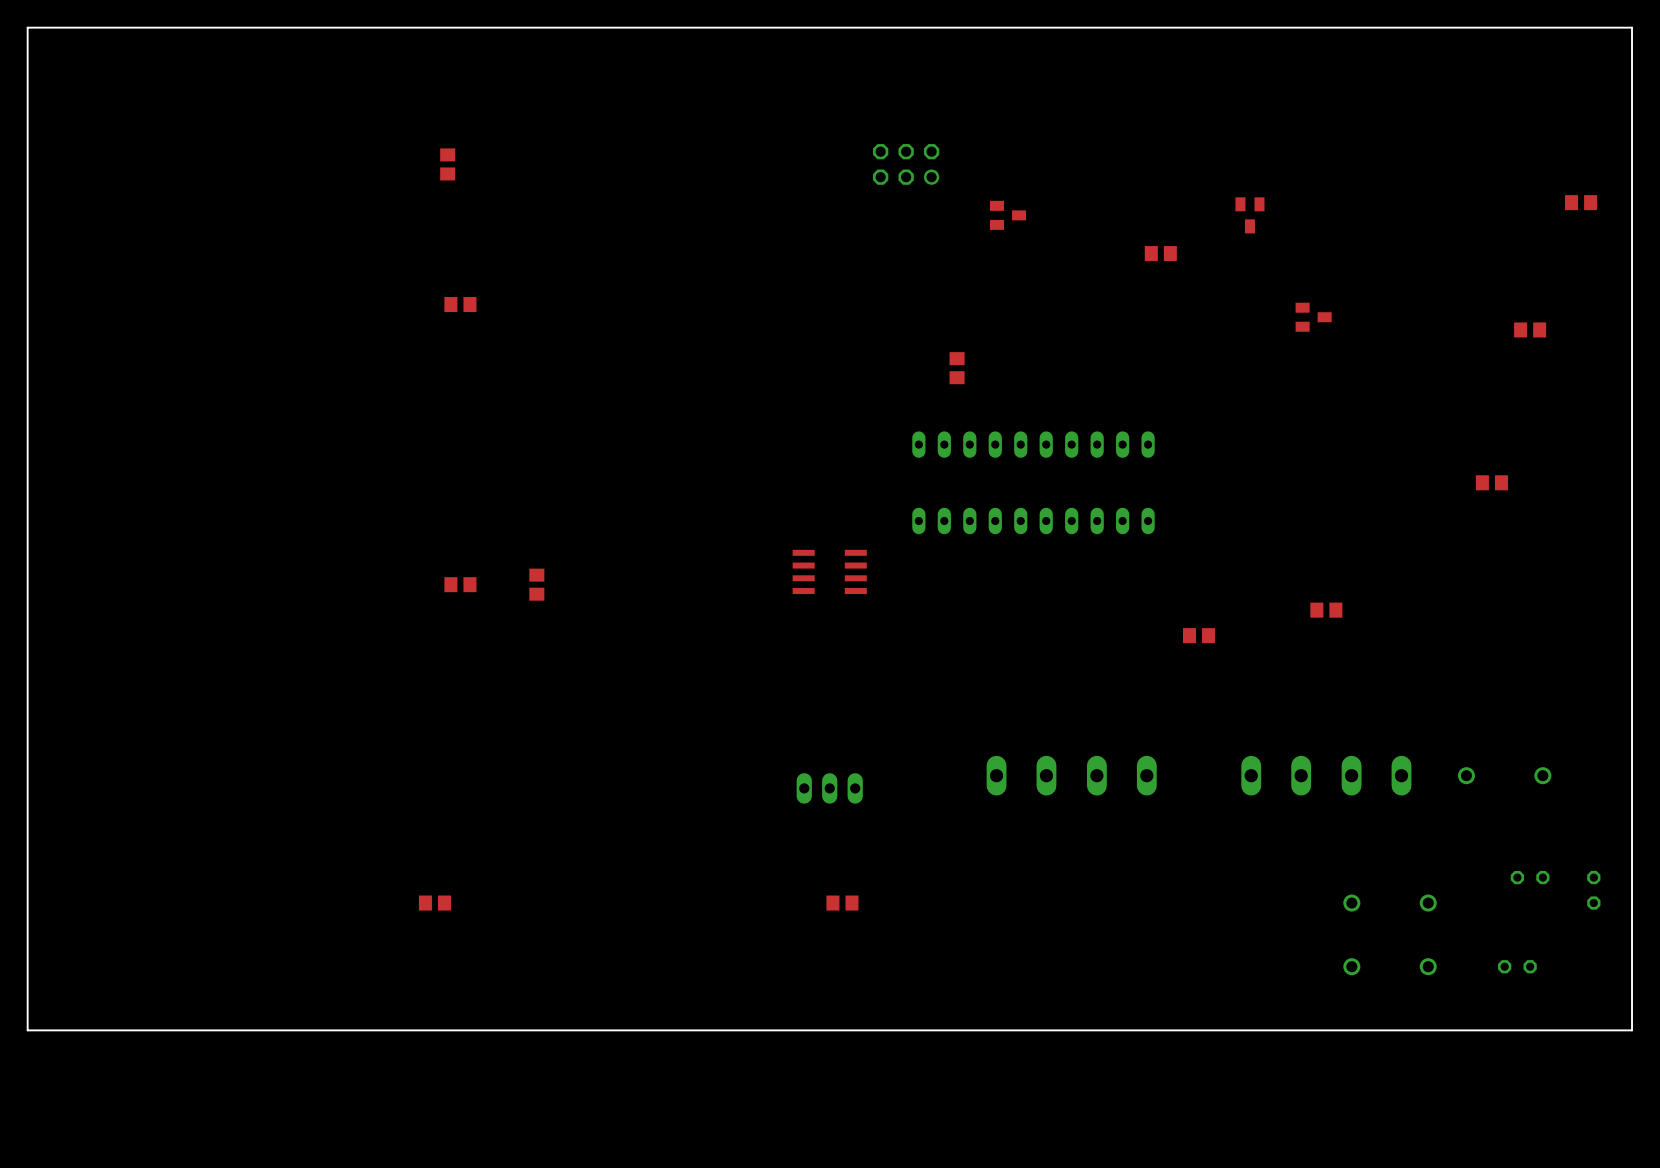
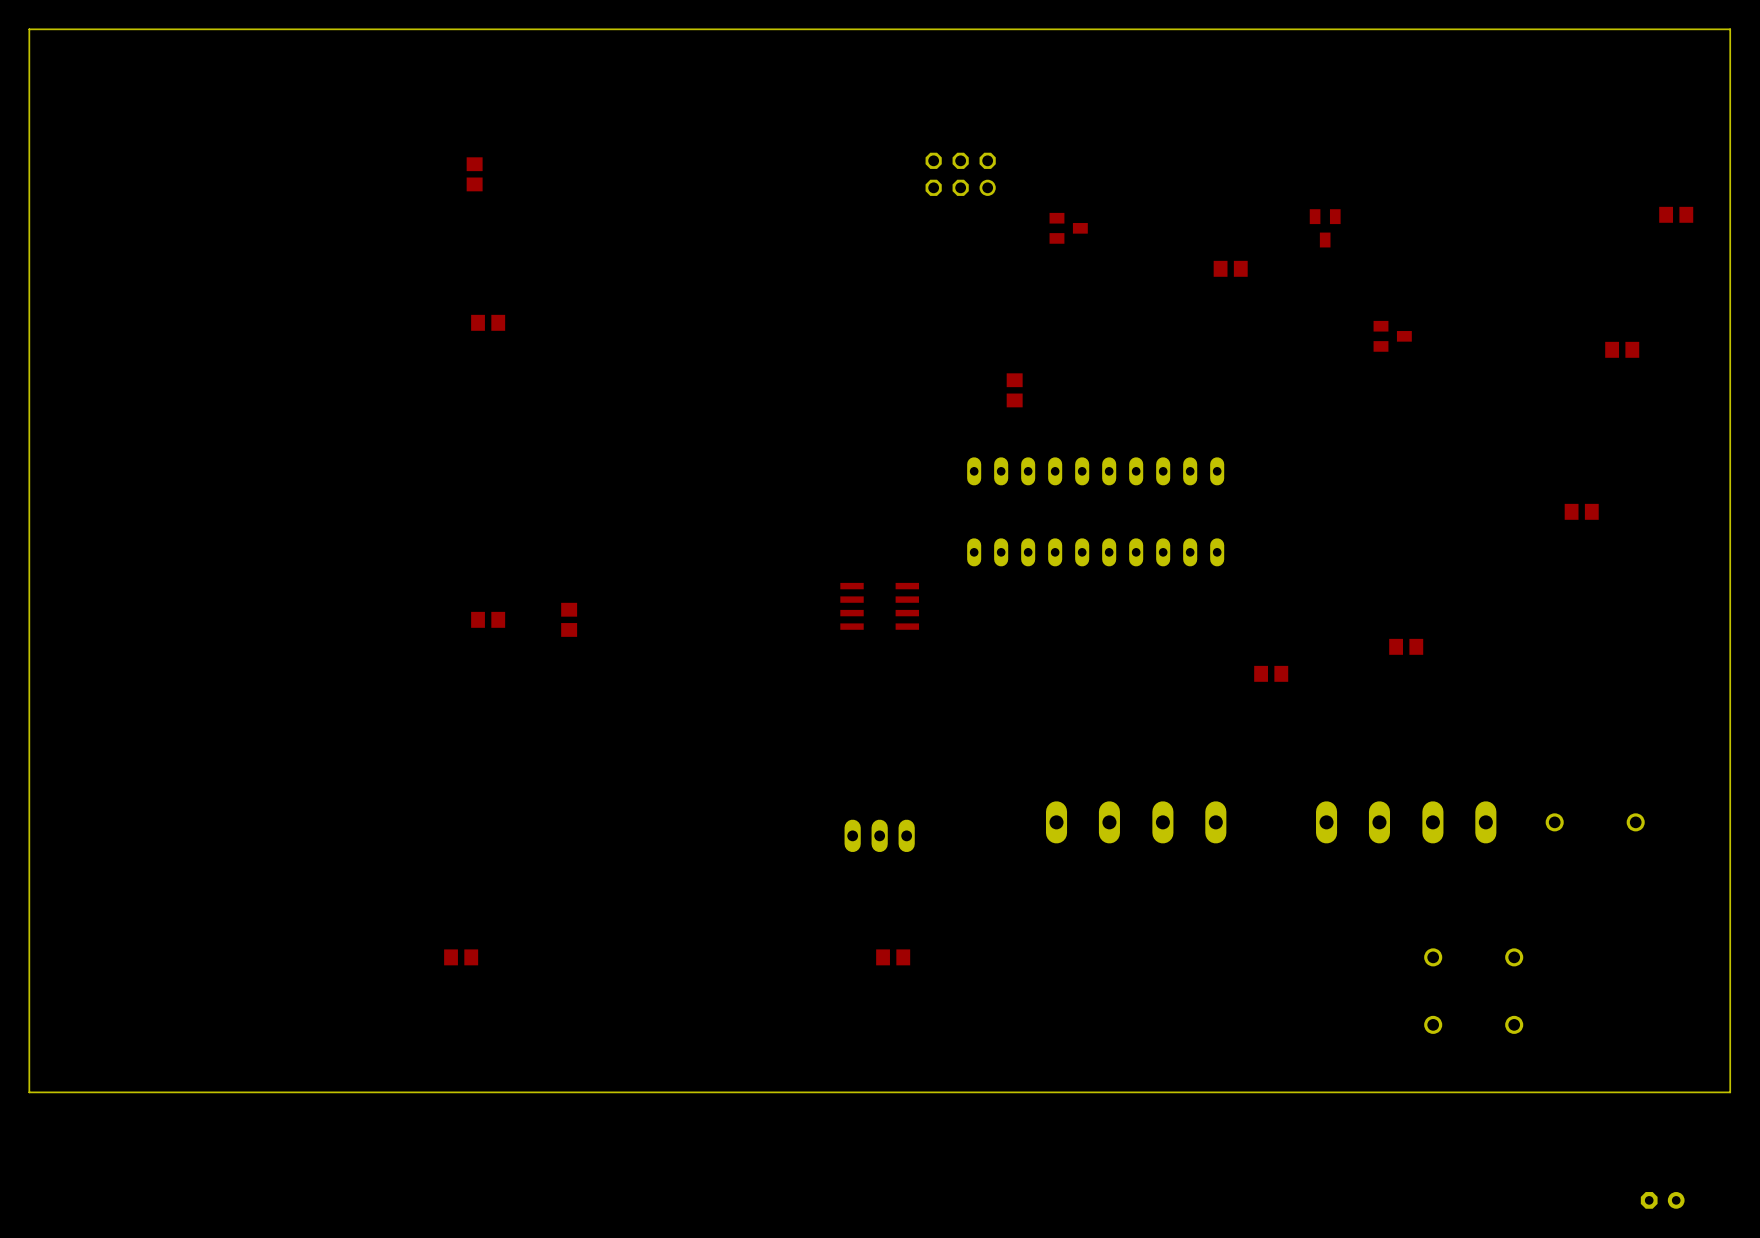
part: (1530, 877) -> none
part: (1593, 890) -> none
part: (1517, 966) -> none
part: none -> (1662, 1200)

